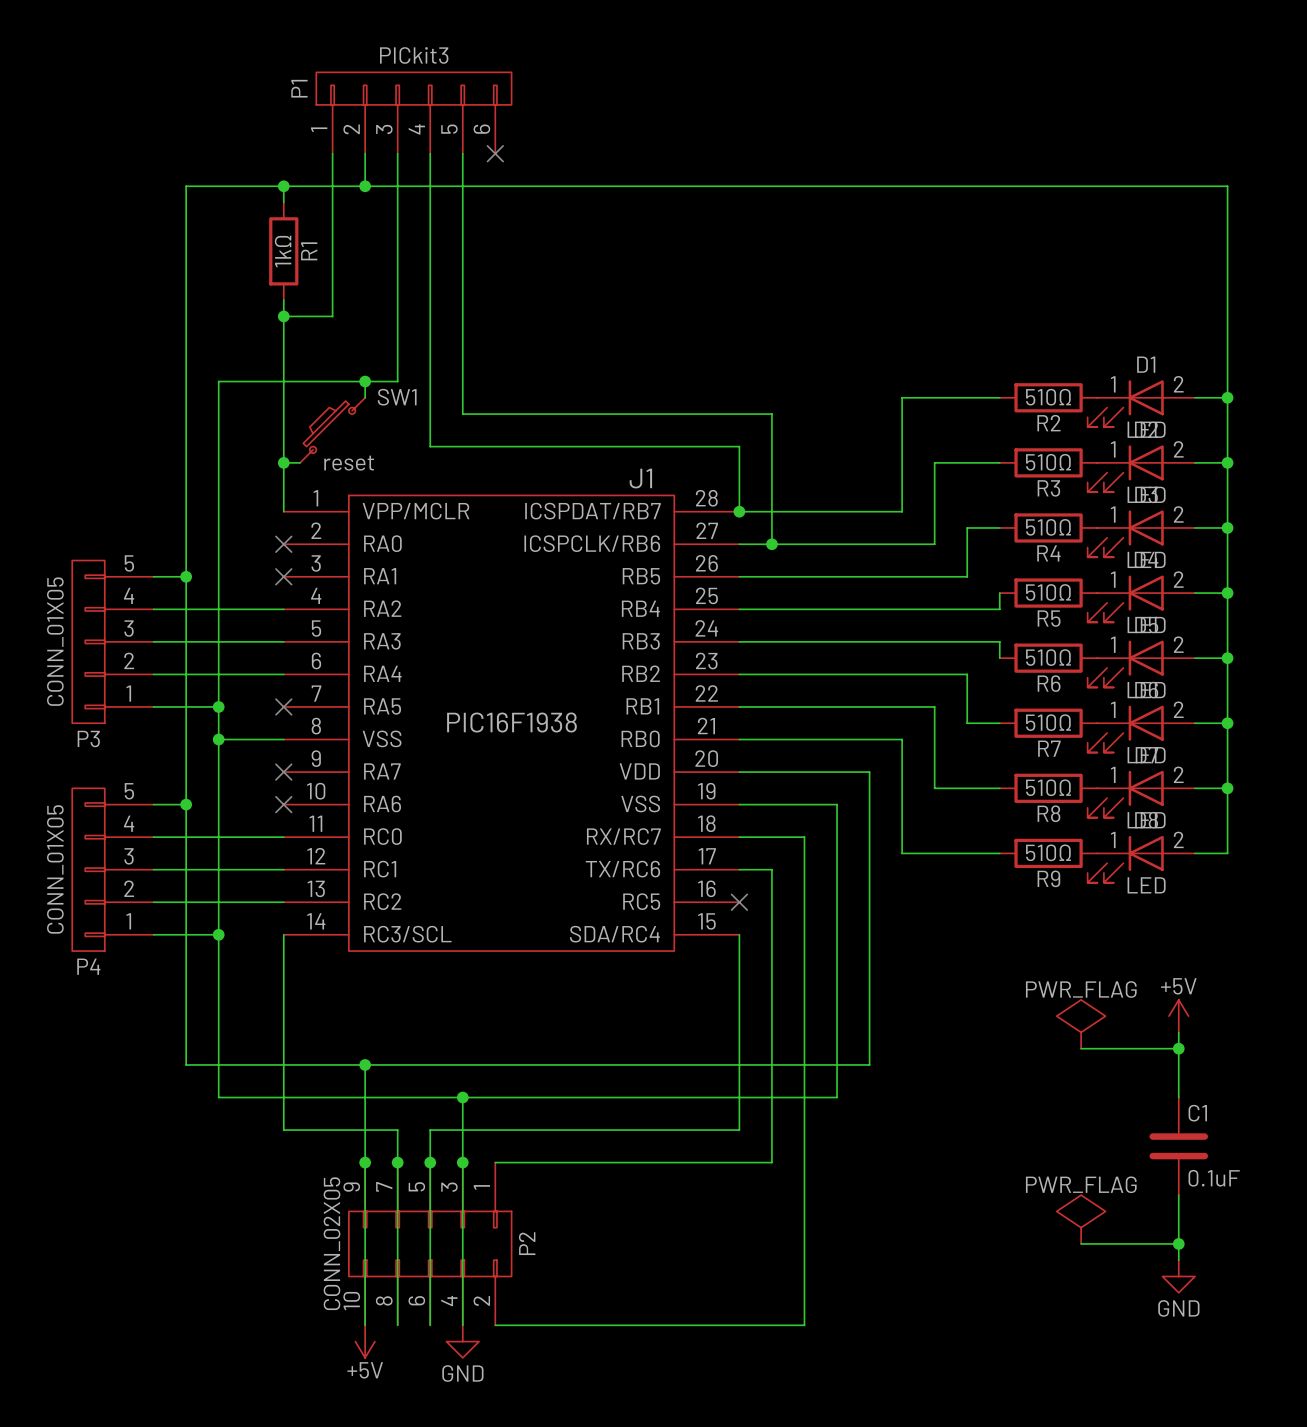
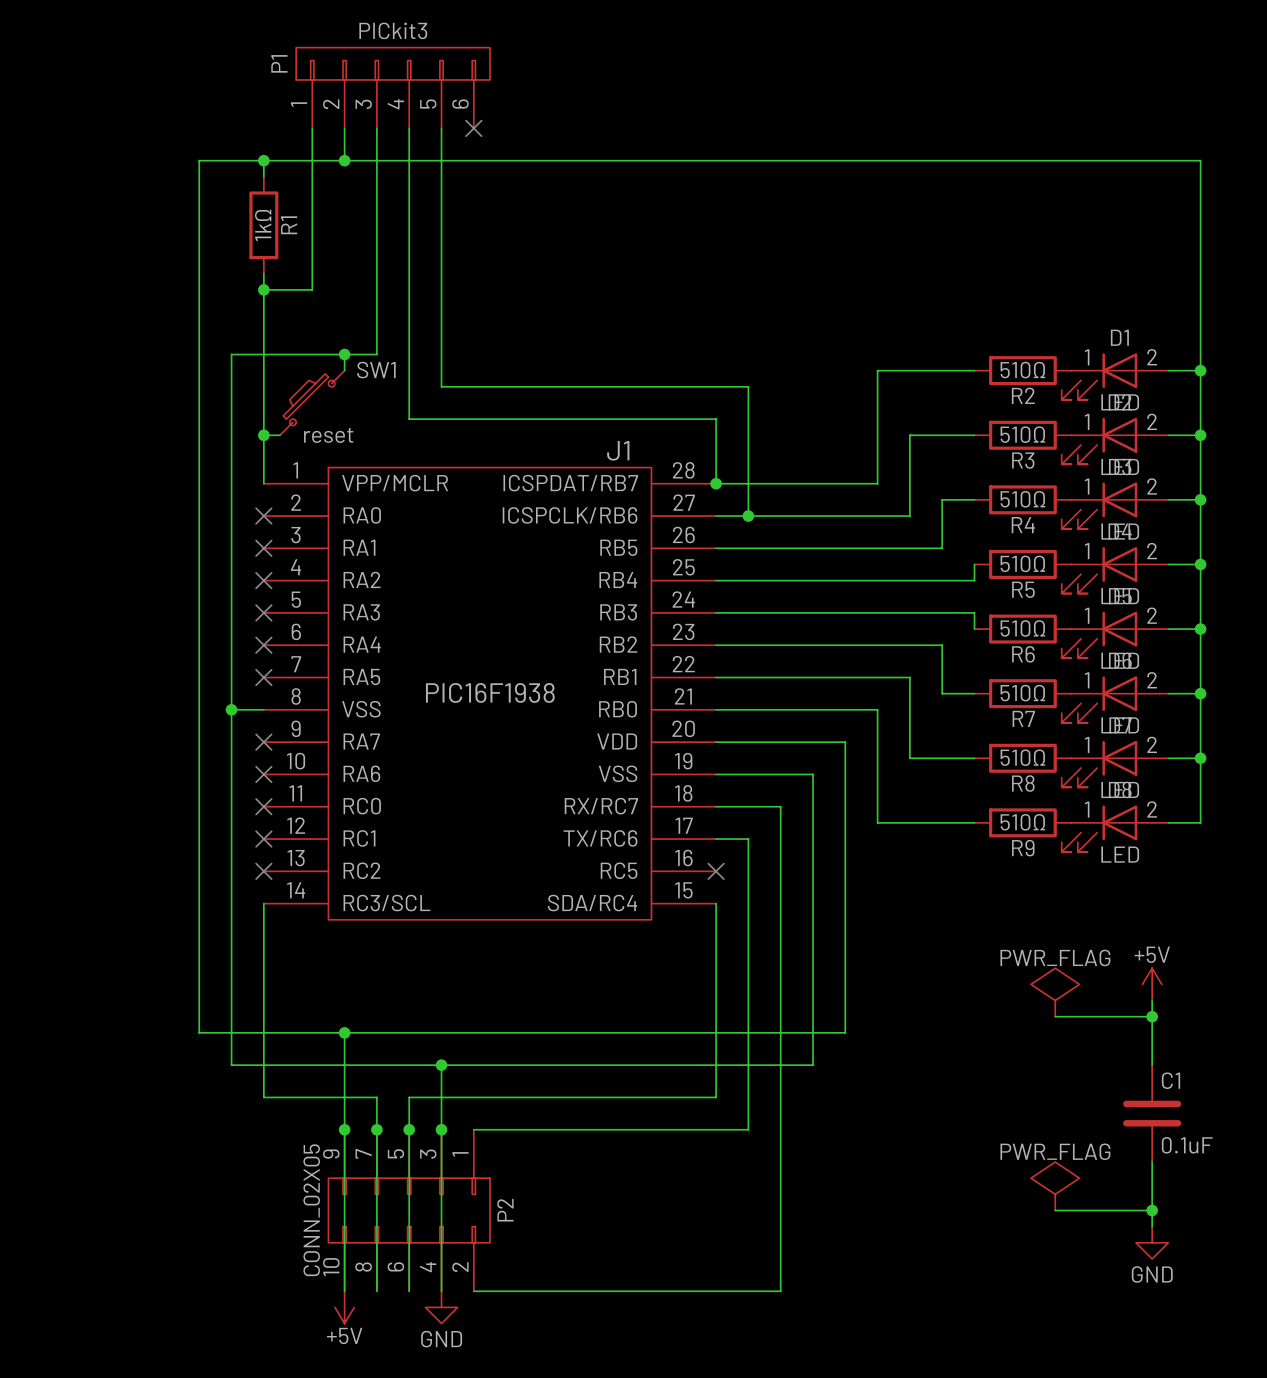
wire: (218, 186) (186, 186) (186, 1064) (218, 1064) (218, 1097) (251, 1097) -> (231, 354) (231, 1065)
wire: (218, 381) (251, 381) -> (199, 354) (199, 160)
wire: (153, 576) (186, 576) -> none
junction: (186, 576) -> none
wire: (153, 609) (283, 609) -> none
no-connect mark: none -> (263, 580)
P3: CONN_01X05 (112, 641) -> none
wire: (153, 641) (283, 641) -> none
no-connect mark: none -> (263, 612)
wire: (153, 674) (283, 674) -> none
no-connect mark: none -> (263, 645)
wire: (153, 706) (218, 706) -> none
junction: (218, 706) -> none
wire: (218, 739) (251, 739) -> none
junction: (218, 739) -> none
junction: none -> (231, 709)
wire: (153, 804) (186, 804) -> none
junction: (186, 804) -> none
wire: (153, 837) (283, 837) -> none
no-connect mark: none -> (263, 806)
P4: CONN_01X05 (112, 869) -> none
wire: (153, 869) (283, 869) -> none
no-connect mark: none -> (263, 839)
wire: (153, 902) (283, 902) -> none
no-connect mark: none -> (263, 871)
wire: (153, 934) (218, 934) -> none
junction: (218, 934) -> none

